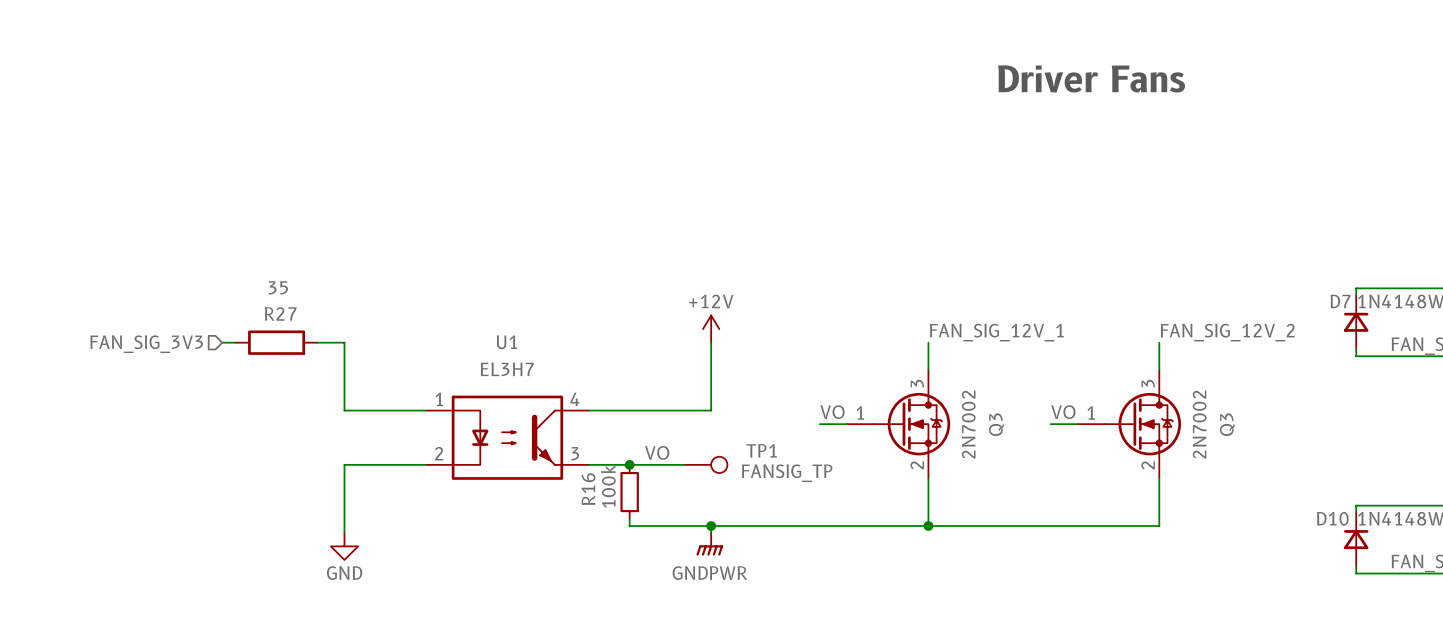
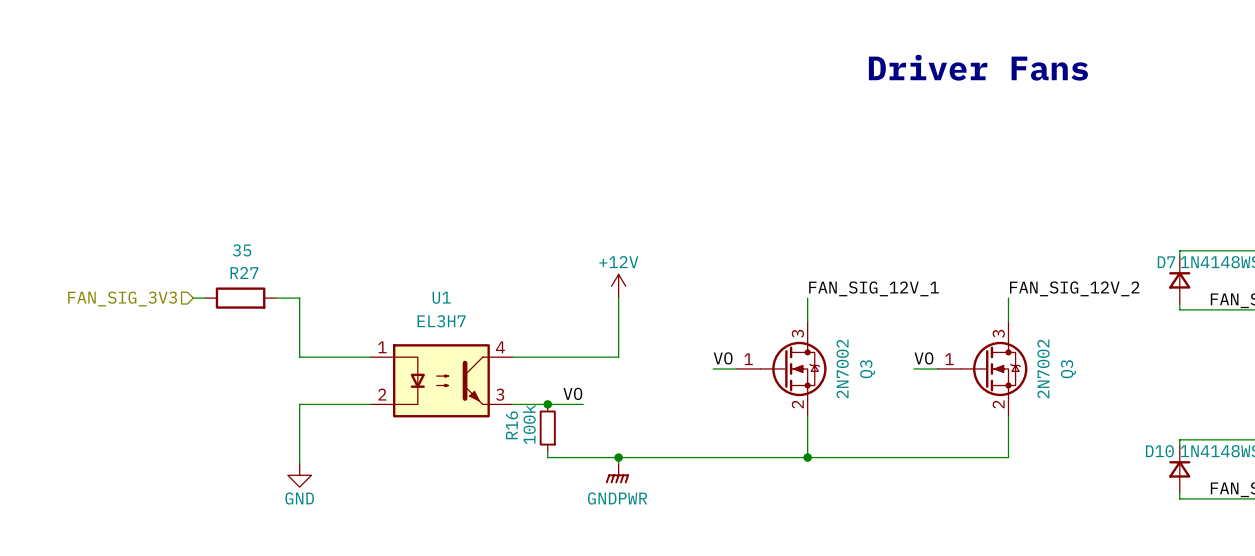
wire: (670, 464) (683, 464) -> none
TP1: FANSIG_TP (705, 464) -> none

